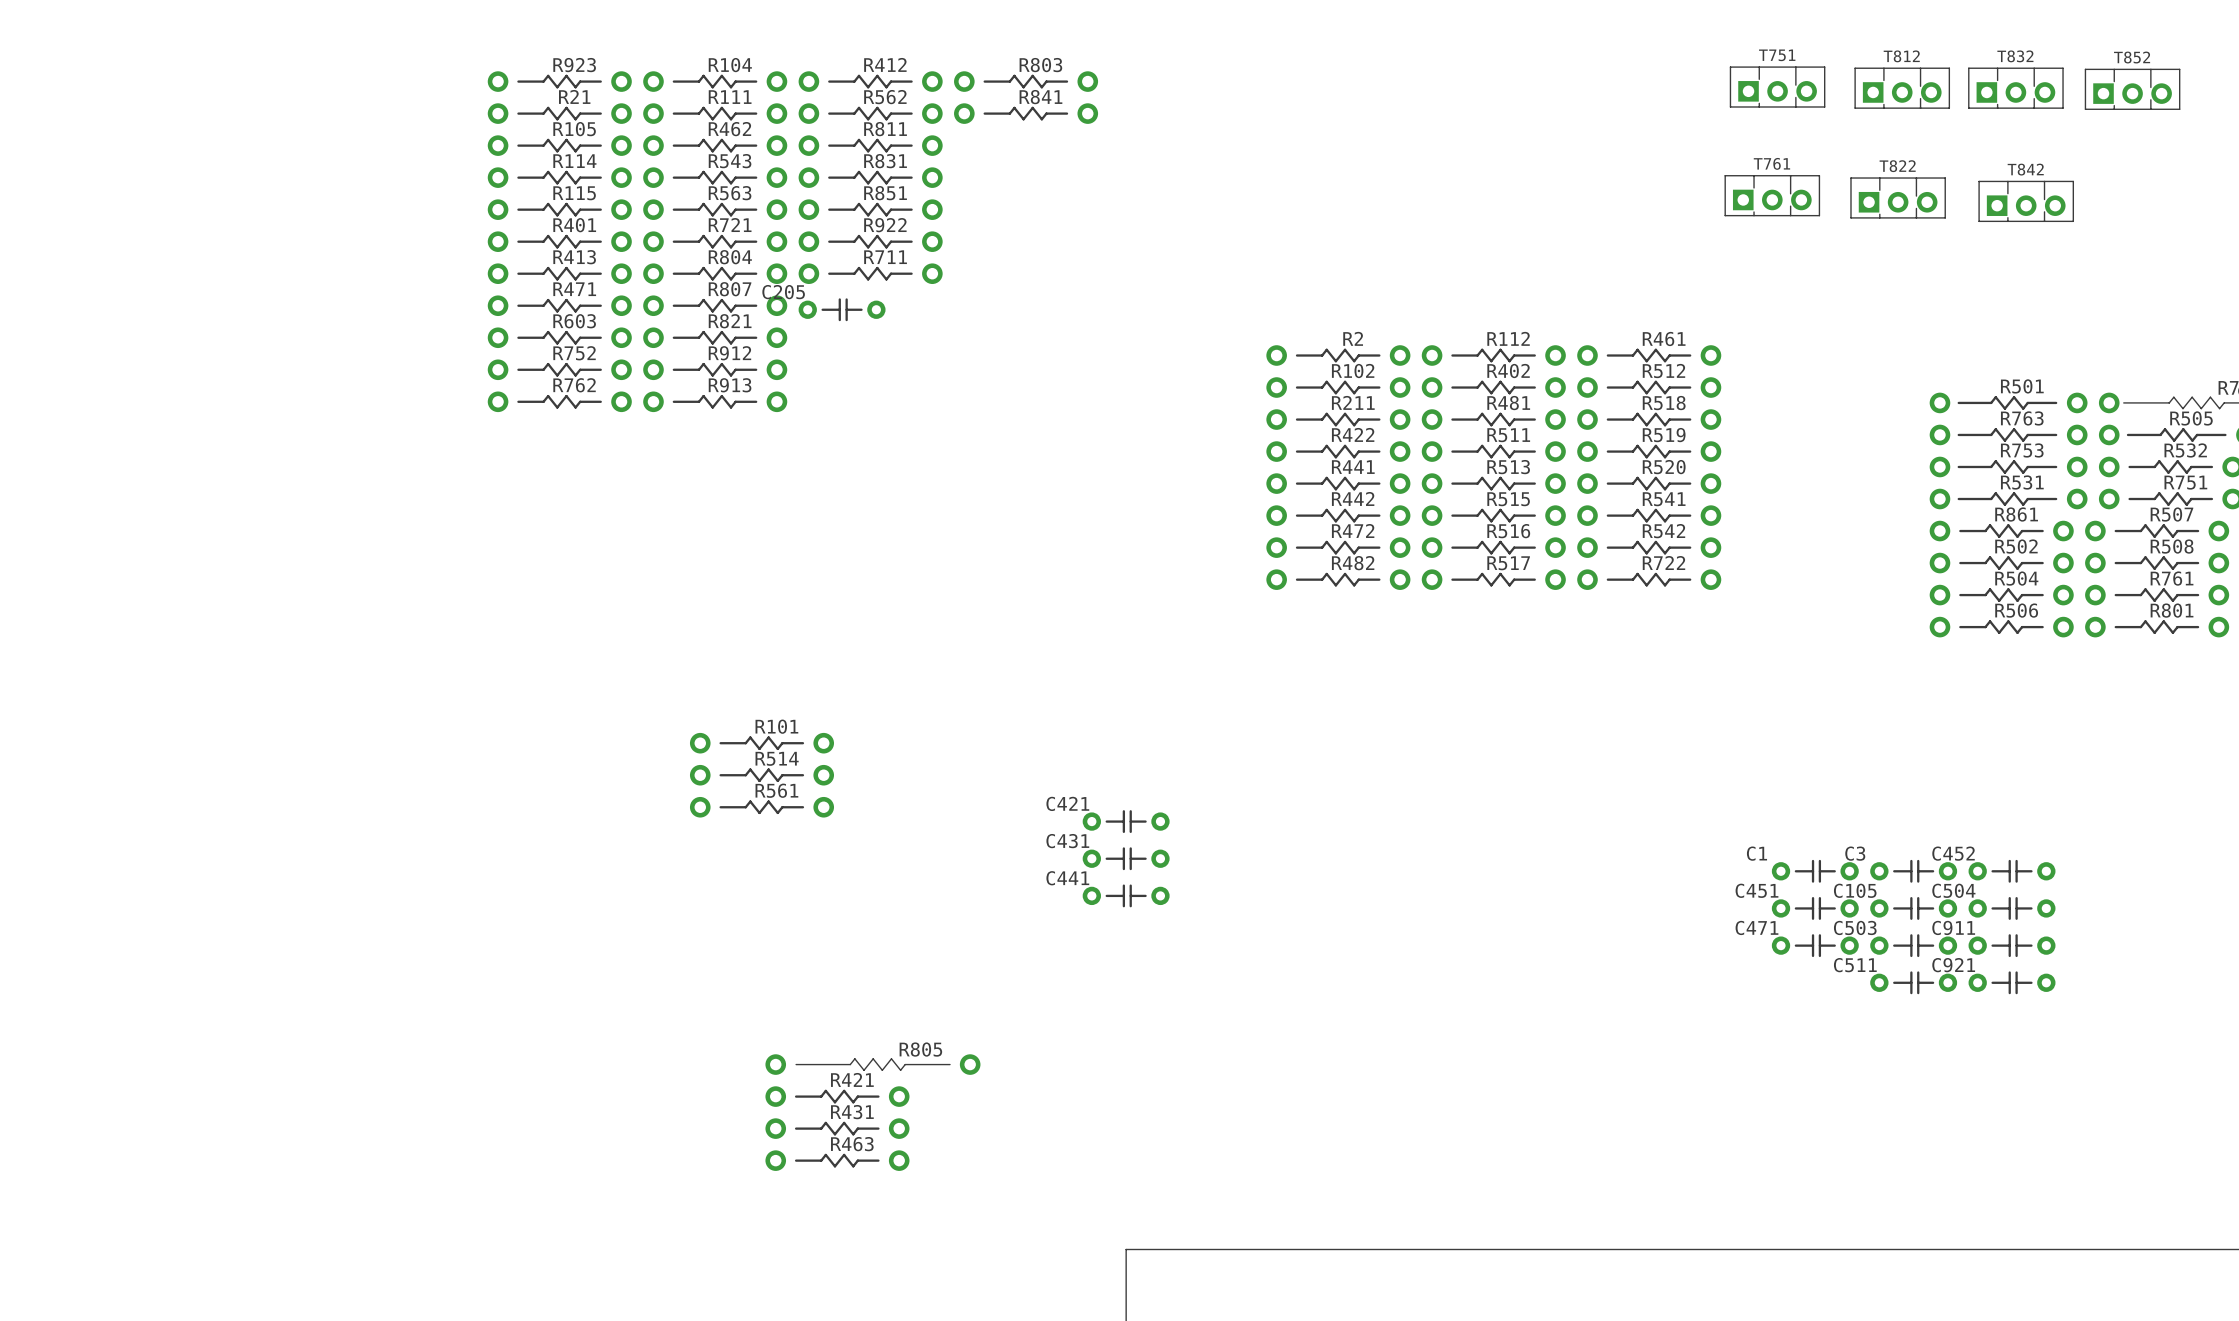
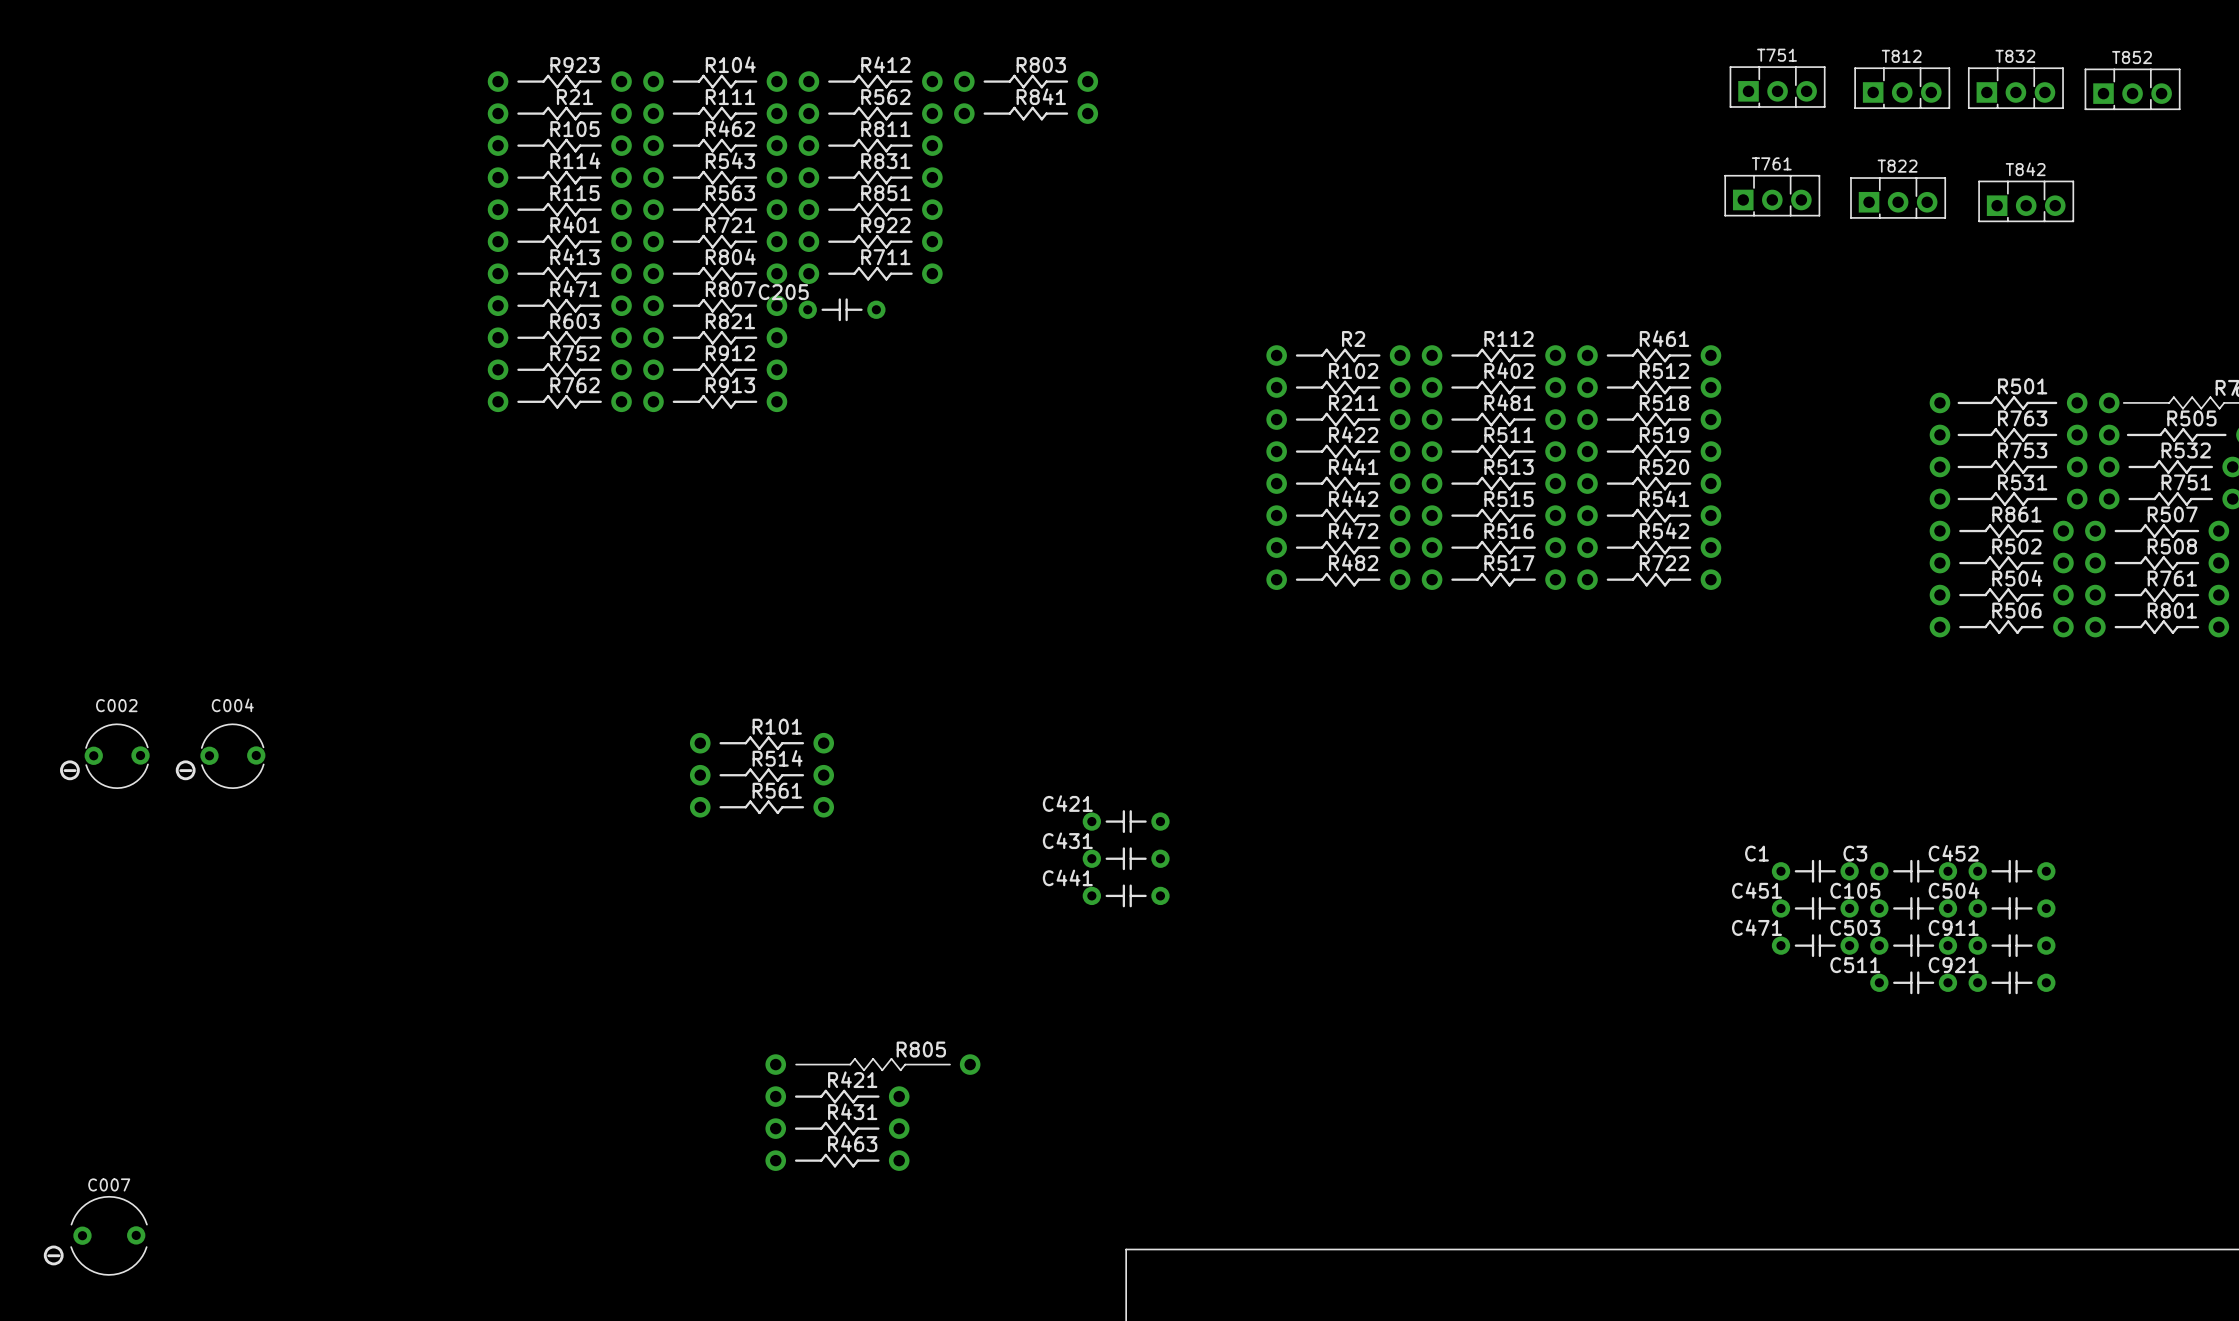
C002: none -> (104, 756)
C004: none -> (220, 756)
C007: none -> (95, 1235)

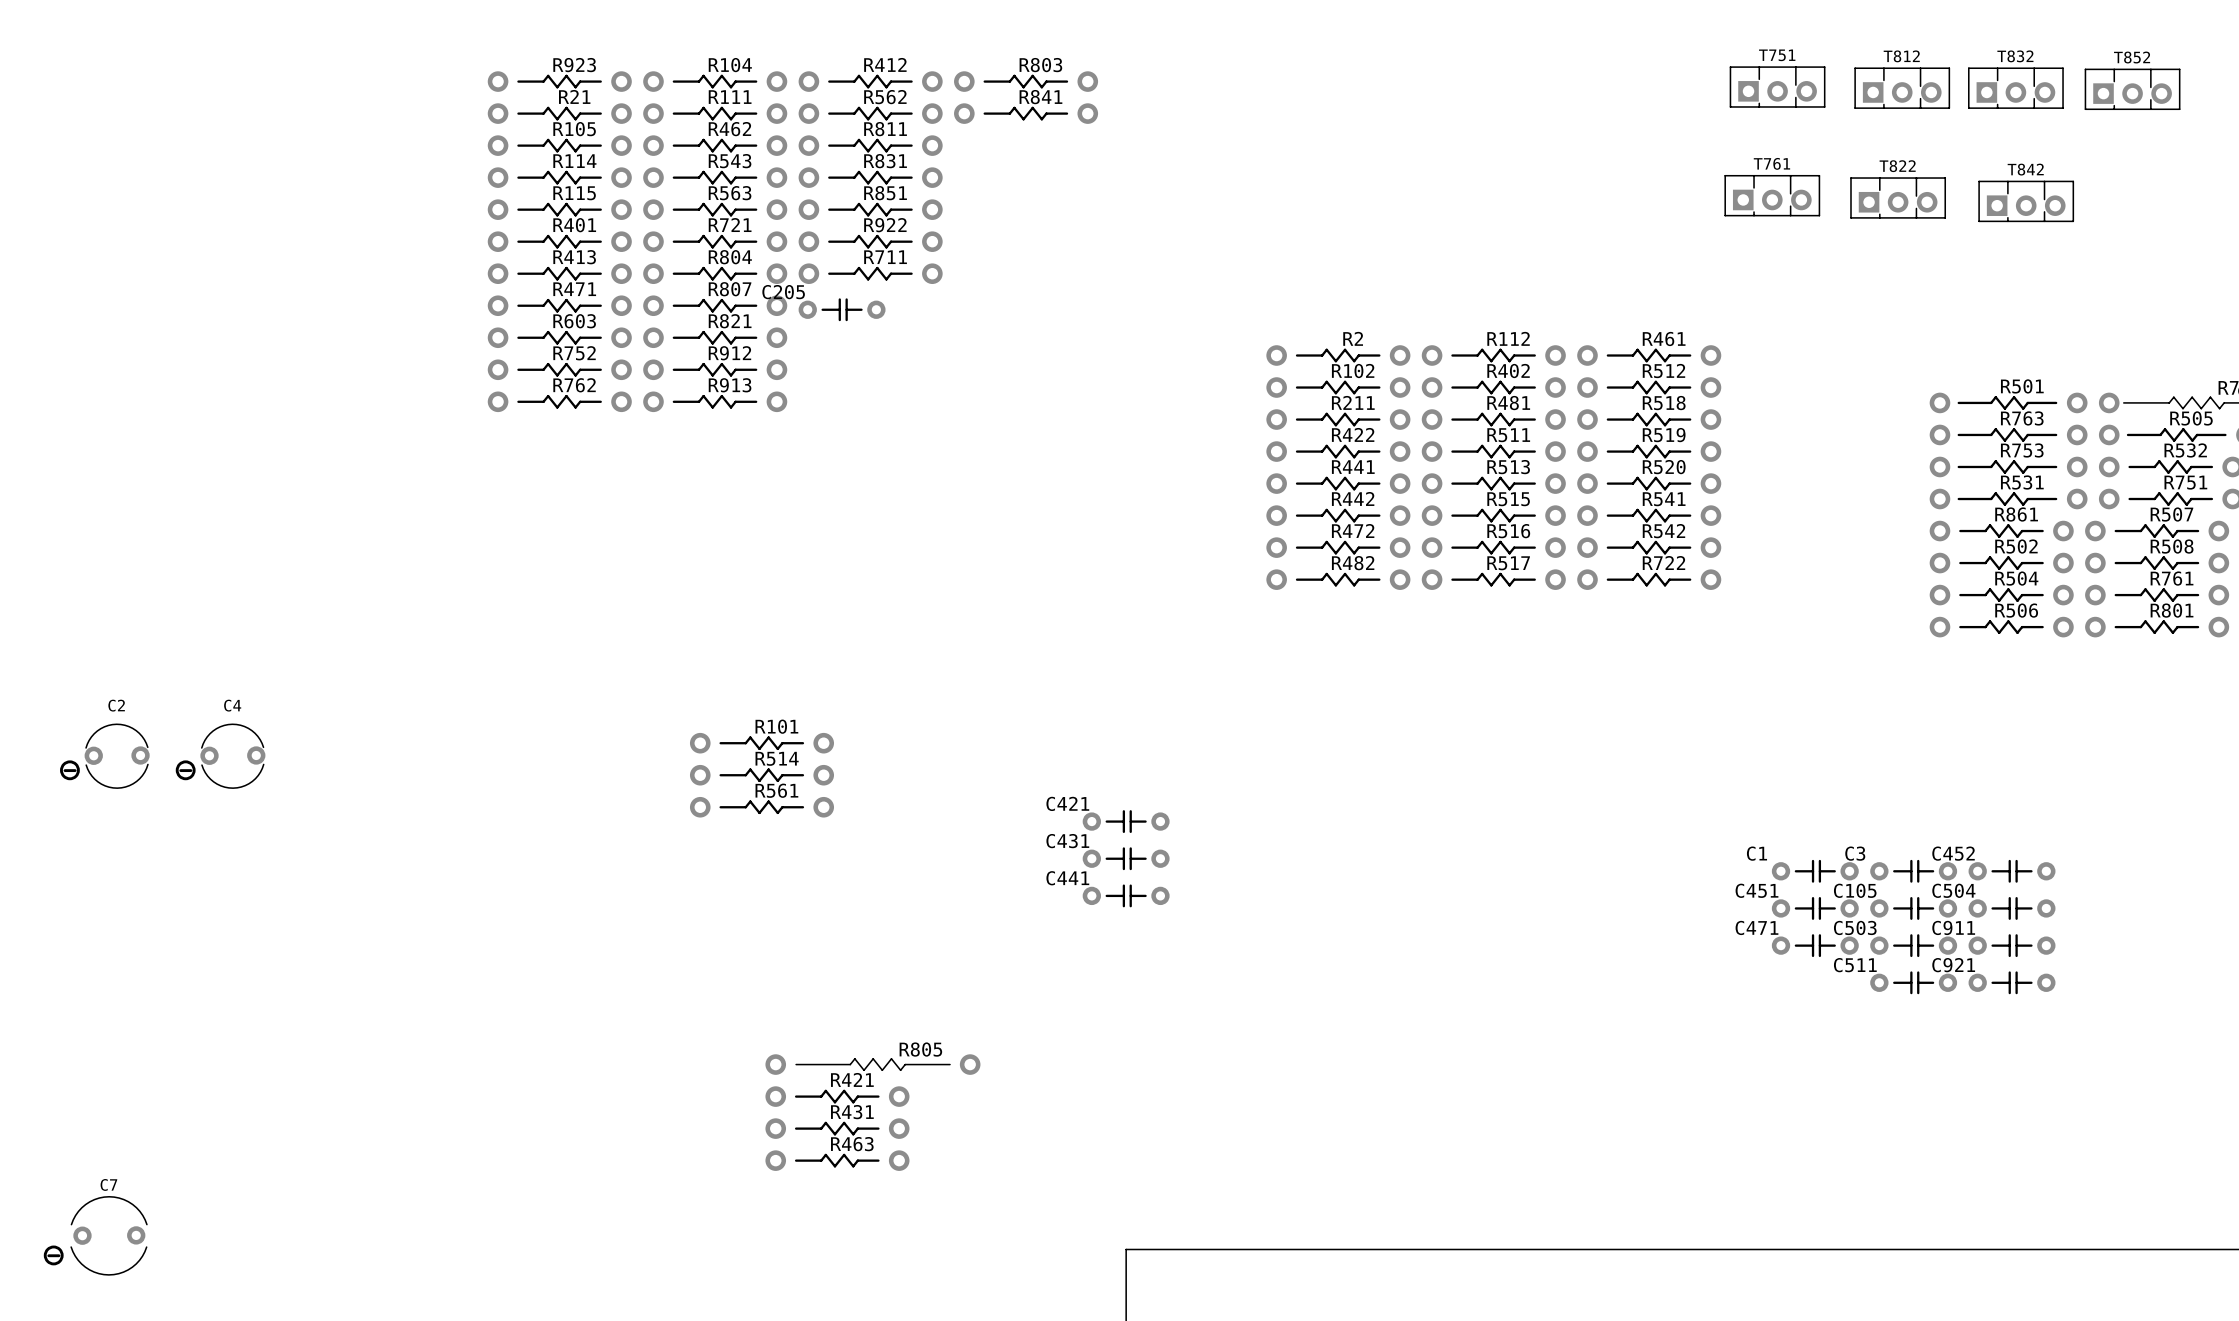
C002 name: C002 (116, 705) -> C2 (116, 705)
C004 name: C004 (232, 705) -> C4 (232, 705)
C007 name: C007 (109, 1184) -> C7 (108, 1184)

